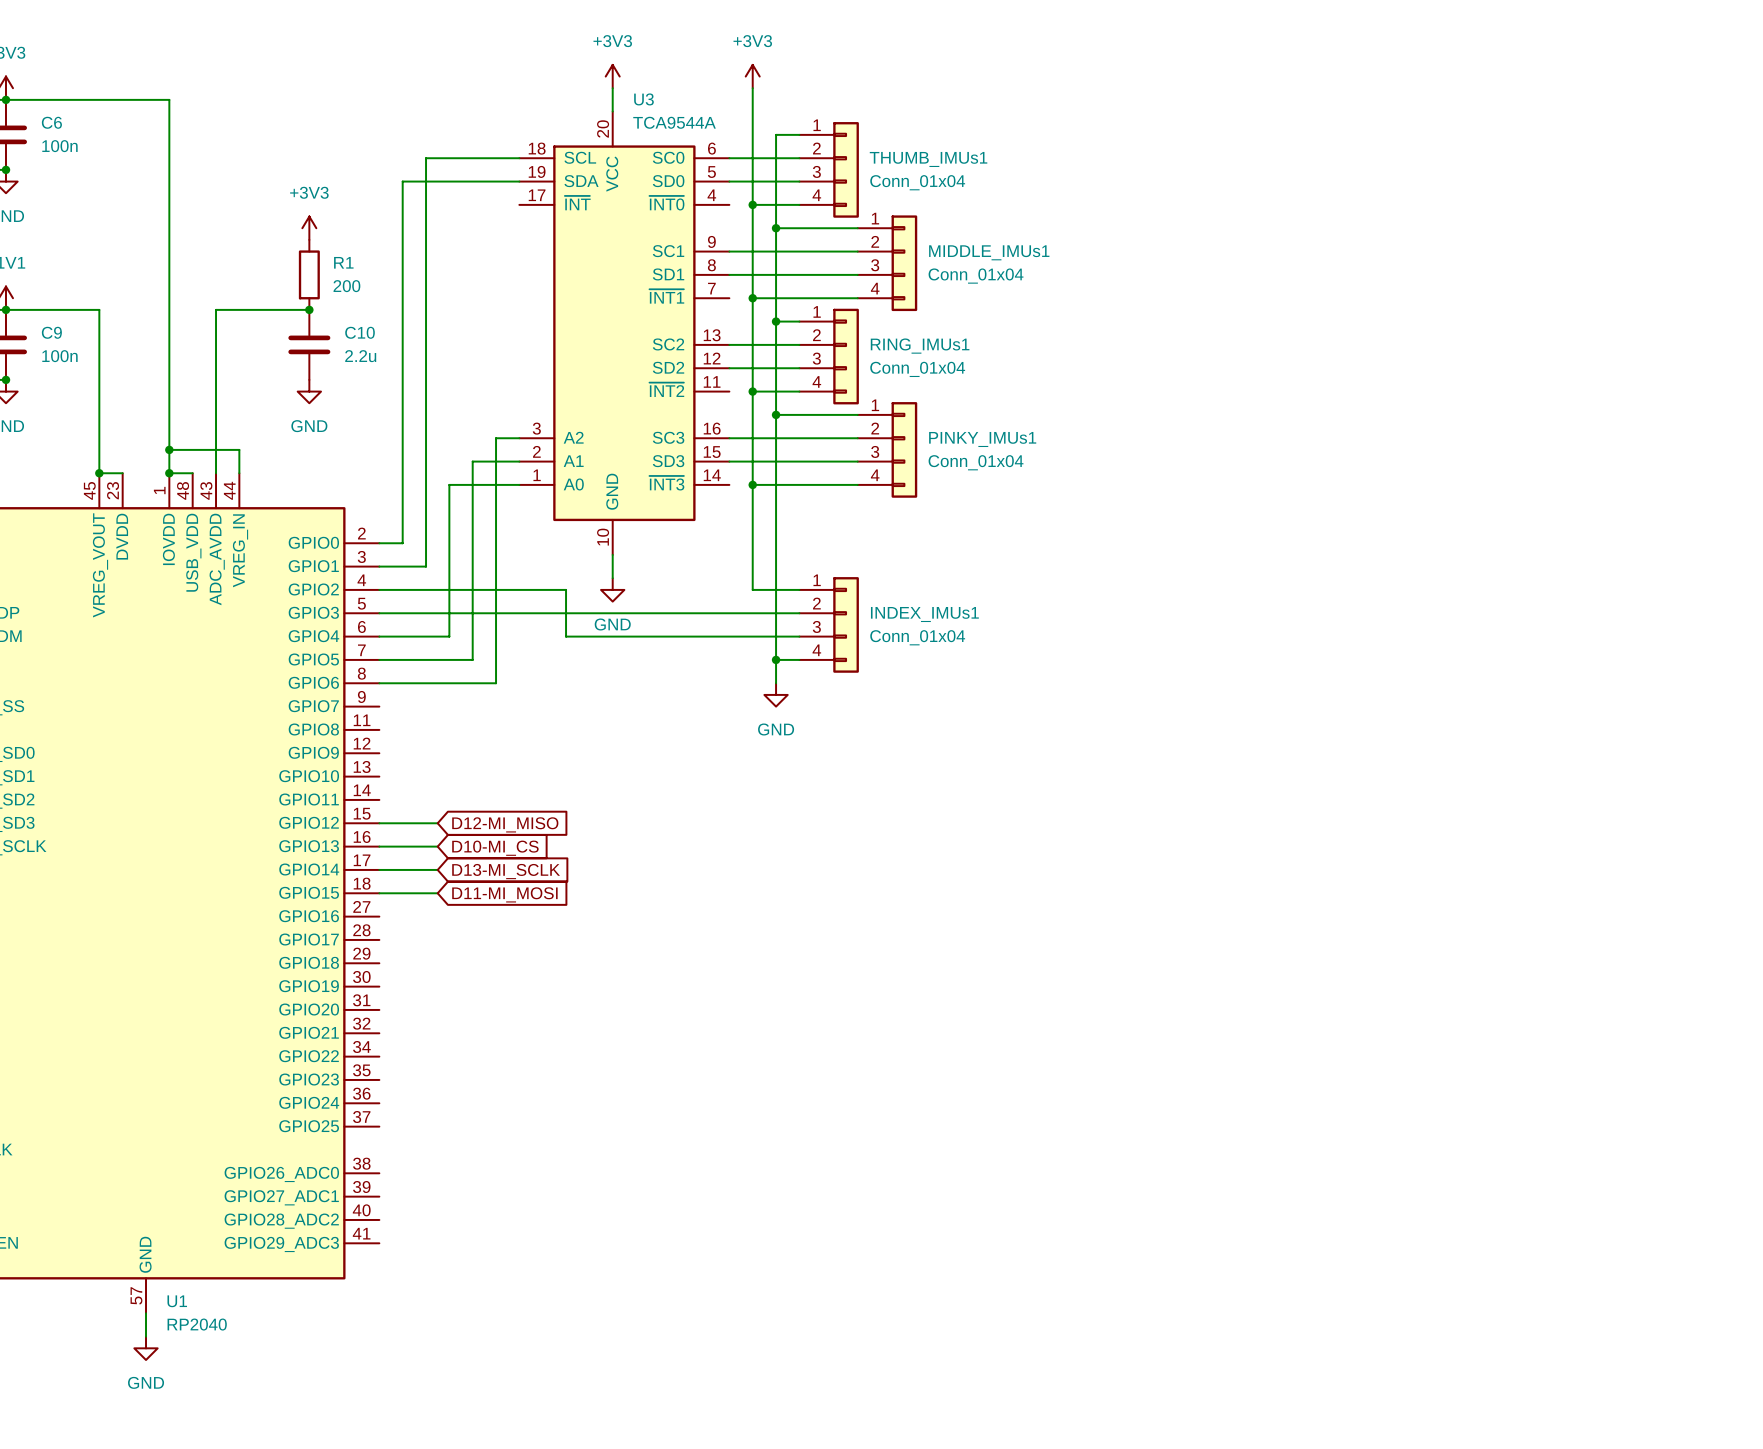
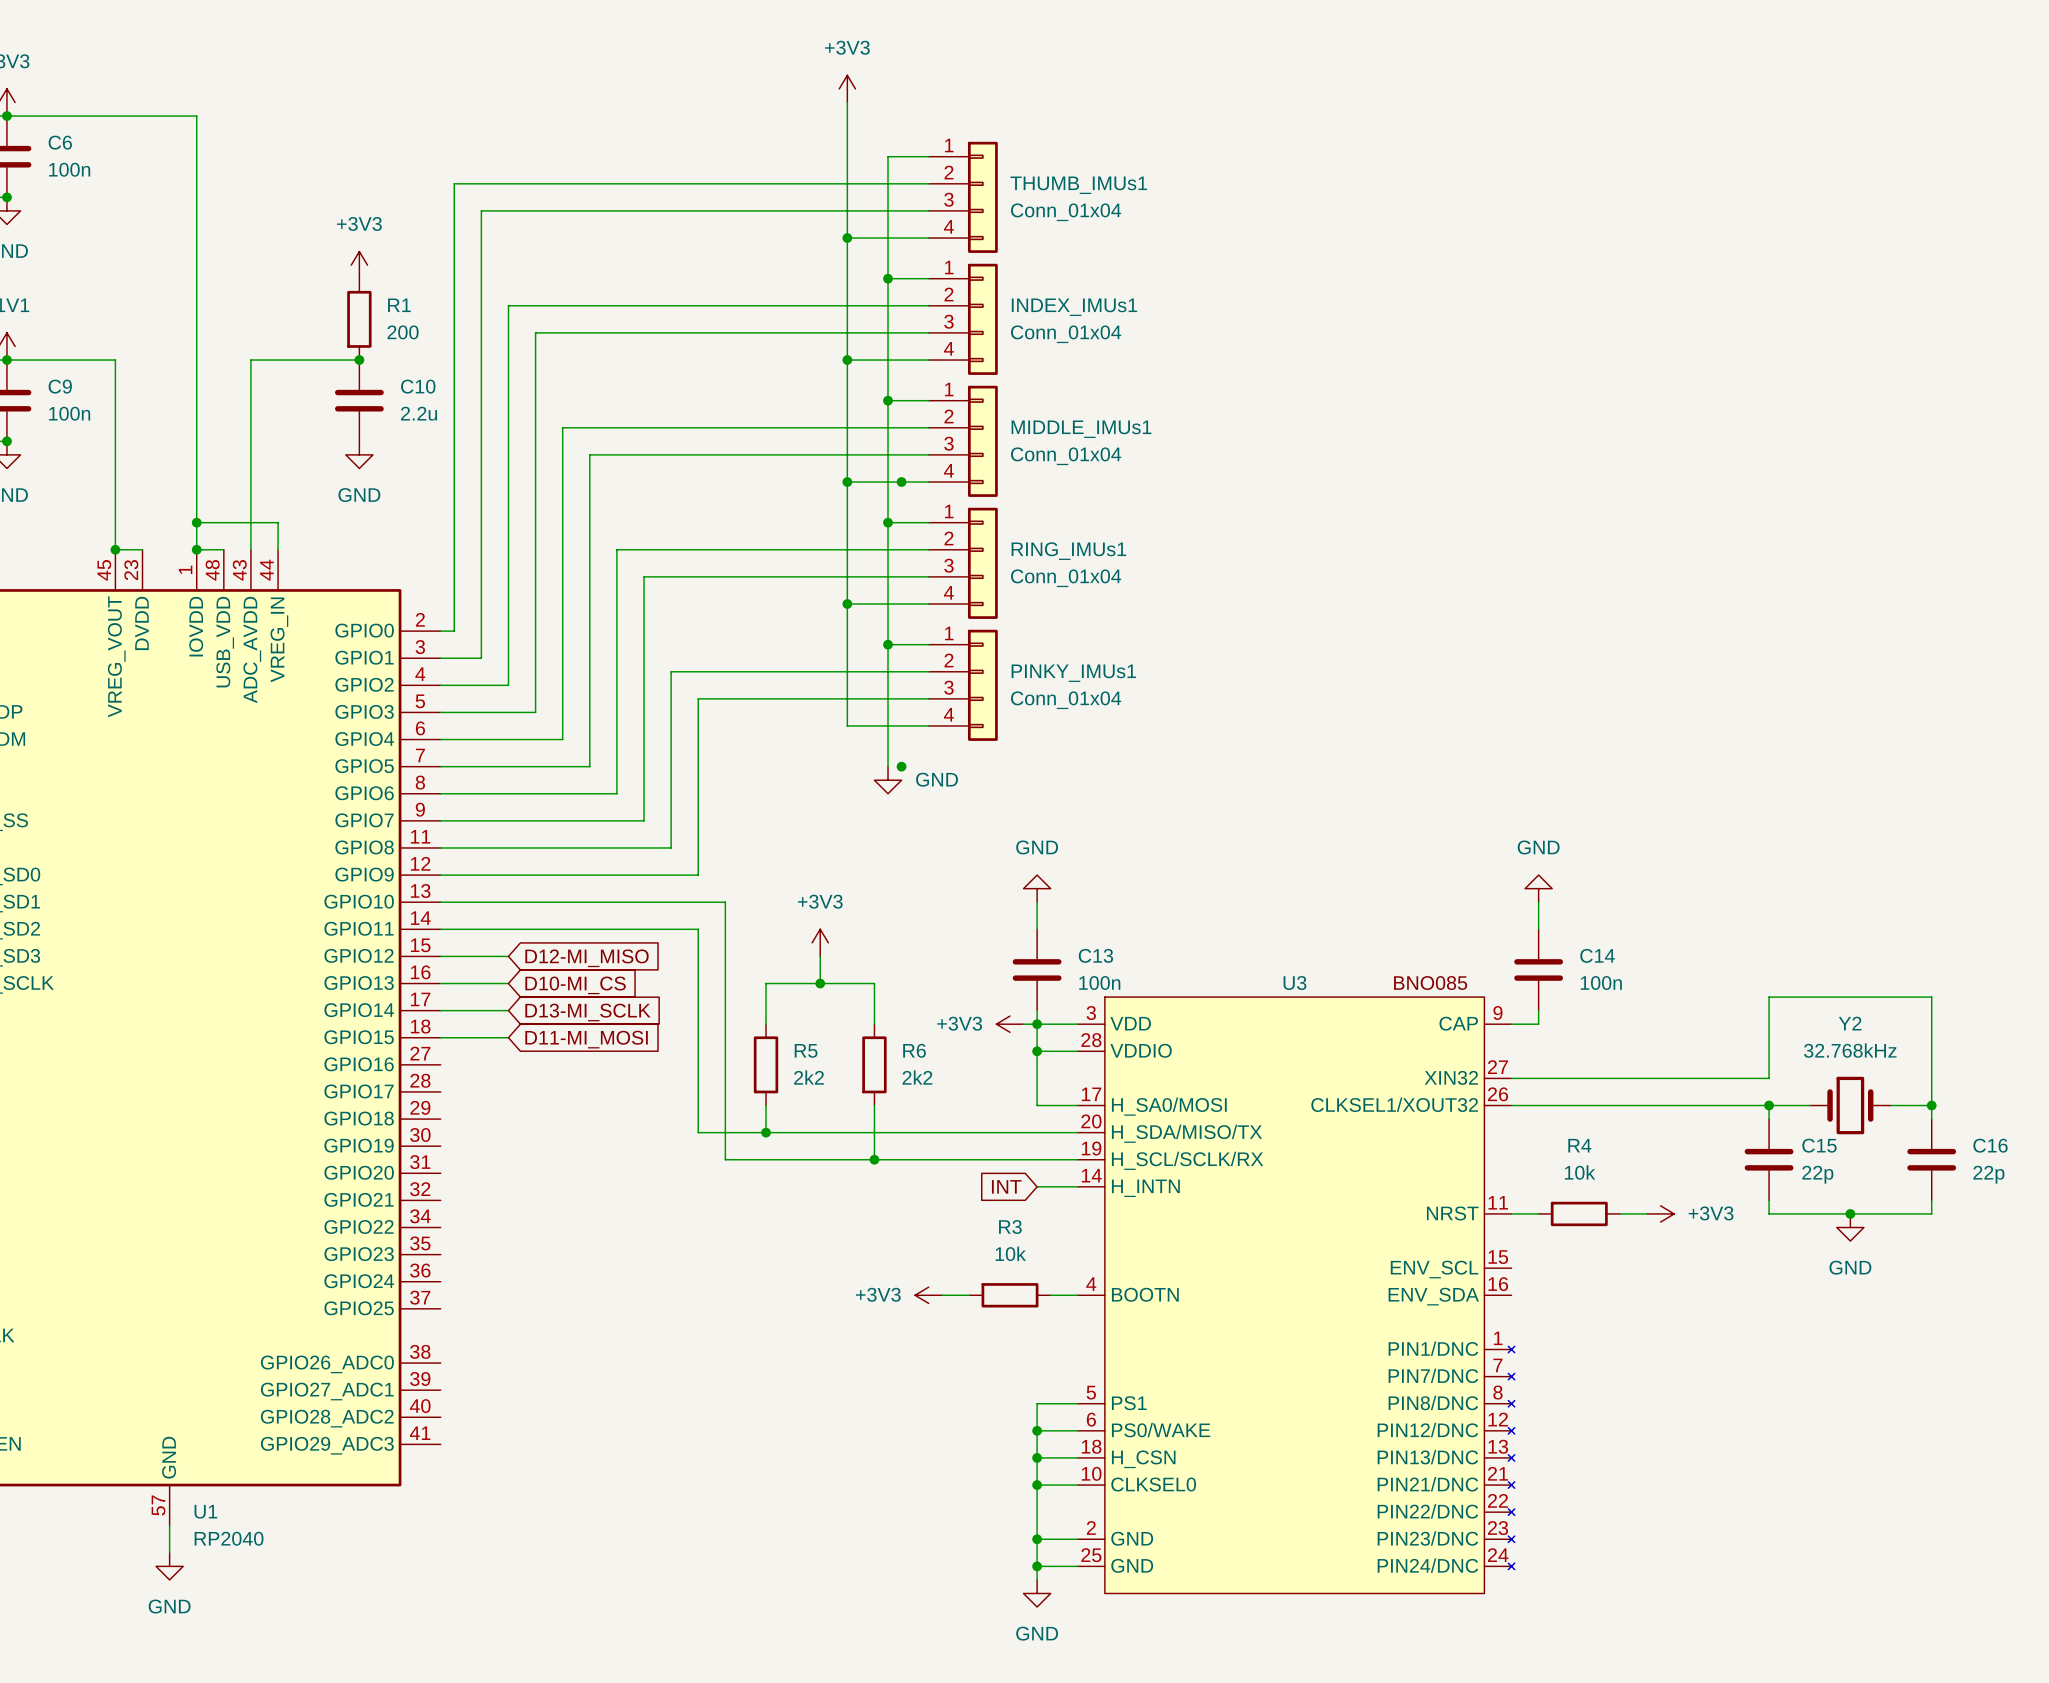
power symbol: +3V3 (612, 76) -> none
power symbol position: +3V3 (752, 76) -> +3V3 (847, 88)
wire: (612, 88) (612, 111) -> none
wire: none -> (847, 102) (847, 725) (928, 725)
wire: (752, 88) (752, 589) (799, 589) -> none
U3 name position: U3 (643, 99) -> U3 (1294, 983)
U3 symbol: [519, 111, 730, 555] -> [1077, 997, 1515, 1594]
U3 value: TCA9544A (674, 122) -> none
wire: (776, 134) (776, 683) -> (901, 156) (888, 156) (888, 766)
wire: (426, 158) (426, 566) (414, 566) -> (481, 210) (481, 658)
wire: (414, 181) (402, 181) (402, 543) (391, 543) -> (494, 183) (454, 183) (454, 631)
junction: none -> (847, 238)
junction: (752, 204) -> none
wire: (776, 228) (857, 228) -> none
junction position: (776, 228) -> (888, 278)
wire: (729, 251) (857, 251) -> none
MIDDLE_IMUs1 position: (887, 263) -> (963, 441)
wire: (729, 274) (857, 274) -> none
wire: (752, 298) (857, 298) -> none
junction: (752, 298) -> none
wire: none -> (847, 360) (928, 360)
junction: none -> (847, 360)
wire: (776, 321) (799, 321) -> (847, 238) (874, 238)
junction: (776, 321) -> none
wire: (729, 344) (764, 344) -> (888, 278) (928, 278)
junction: none -> (888, 400)
RING_IMUs1 position: (829, 356) -> (963, 563)
junction: (752, 391) -> none
wire: none -> (847, 482) (901, 482)
junction: none -> (847, 482)
wire: (519, 438) (496, 438) (496, 683) -> (928, 549) (616, 549) (616, 793) (576, 793)
wire: (729, 438) (857, 438) -> none
wire: none -> (888, 522) (928, 522)
junction: none -> (888, 522)
PINKY_IMUs1 position: (887, 449) -> (963, 685)
wire: (519, 461) (472, 461) (472, 659) -> (874, 454) (589, 454) (589, 766) (549, 766)
wire: (729, 461) (857, 461) -> none
wire: (519, 484) (449, 484) (449, 636) -> (847, 427) (562, 427) (562, 739) (522, 739)
wire: (752, 484) (857, 484) -> none
junction: (752, 484) -> none
wire: none -> (928, 576) (644, 576) (644, 820) (440, 820)
wire: none -> (847, 604) (928, 604)
junction: none -> (847, 604)
wire: (612, 554) (612, 578) -> none
wire: none -> (888, 644) (928, 644)
junction: none -> (888, 644)
wire: none -> (928, 671) (671, 671) (671, 847) (440, 847)
wire: (437, 589) (566, 589) (566, 636) (799, 636) -> (508, 685) (508, 305) (928, 305)
power symbol: GND (612, 589) -> none
wire: none -> (928, 698) (698, 698) (698, 875) (440, 875)
wire: (461, 613) (799, 613) -> (535, 712) (535, 332) (928, 332)
INDEX_IMUs1 position: (829, 624) -> (963, 319)
wire: (776, 659) (799, 659) -> none
power symbol position: GND (776, 694) -> GND (888, 780)
power symbol text position: GND (776, 729) -> GND (937, 779)
power symbol: none -> GND (1037, 888)
power symbol: none -> GND (1538, 888)
wire: none -> (440, 902) (725, 902) (725, 1159) (1077, 1159)
wire: none -> (1037, 902) (1037, 929)
wire: none -> (1538, 902) (1538, 929)
wire: none -> (440, 929) (698, 929) (698, 1132) (1077, 1132)
power symbol: none -> +3V3 (820, 942)
wire: none -> (820, 956) (820, 983)
C13: none -> 100n (1037, 969)
C14: none -> 100n (1538, 969)
junction: none -> (820, 983)
wire: none -> (1037, 1010) (1037, 1105) (1077, 1105)
wire: none -> (1538, 1010) (1538, 1024) (1511, 1024)
wire: none -> (766, 1024) (766, 983) (874, 983) (874, 1024)
power symbol: none -> +3V3 (1010, 1024)
wire: none -> (1023, 1024) (1077, 1024)
junction: none -> (1037, 1024)
wire: none -> (1037, 1051) (1077, 1051)
junction: none -> (1037, 1051)
R5: none -> 2k2 (766, 1064)
R6: none -> 2k2 (874, 1064)
wire: none -> (1511, 1078) (1769, 1078) (1769, 997) (1931, 997) (1931, 1119)
wire: none -> (766, 1105) (766, 1132)
wire: none -> (874, 1105) (874, 1159)
wire: none -> (1511, 1105) (1809, 1105)
wire: none -> (1769, 1105) (1769, 1119)
junction: none -> (1769, 1105)
Y2: none -> 32.768kHz (1850, 1105)
wire: none -> (1891, 1105) (1931, 1105)
junction: none -> (1931, 1105)
junction: none -> (766, 1132)
junction: none -> (874, 1159)
C15: none -> 22p (1769, 1159)
C16: none -> 22p (1931, 1159)
global label: none -> INT (1006, 1186)
wire: none -> (1037, 1186) (1077, 1186)
wire: none -> (1769, 1200) (1769, 1213) (1931, 1213) (1931, 1200)
wire: none -> (1511, 1213) (1538, 1213)
R4: none -> 10k (1579, 1213)
wire: none -> (1619, 1213) (1647, 1213)
power symbol: none -> +3V3 (1660, 1213)
junction: none -> (1850, 1213)
power symbol: none -> GND (1850, 1227)
power symbol: none -> +3V3 (928, 1295)
wire: none -> (942, 1295) (969, 1295)
R3: none -> 10k (1010, 1295)
wire: none -> (1050, 1295) (1077, 1295)
wire: none -> (1077, 1403) (1037, 1403) (1037, 1579)
wire: none -> (1037, 1430) (1077, 1430)
junction: none -> (1037, 1430)
wire: none -> (1037, 1457) (1077, 1457)
junction: none -> (1037, 1457)
wire: none -> (1037, 1485) (1077, 1485)
junction: none -> (1037, 1485)
wire: none -> (1037, 1539) (1077, 1539)
junction: none -> (1037, 1539)
wire: none -> (1037, 1566) (1077, 1566)
junction: none -> (1037, 1566)
power symbol: none -> GND (1037, 1593)

